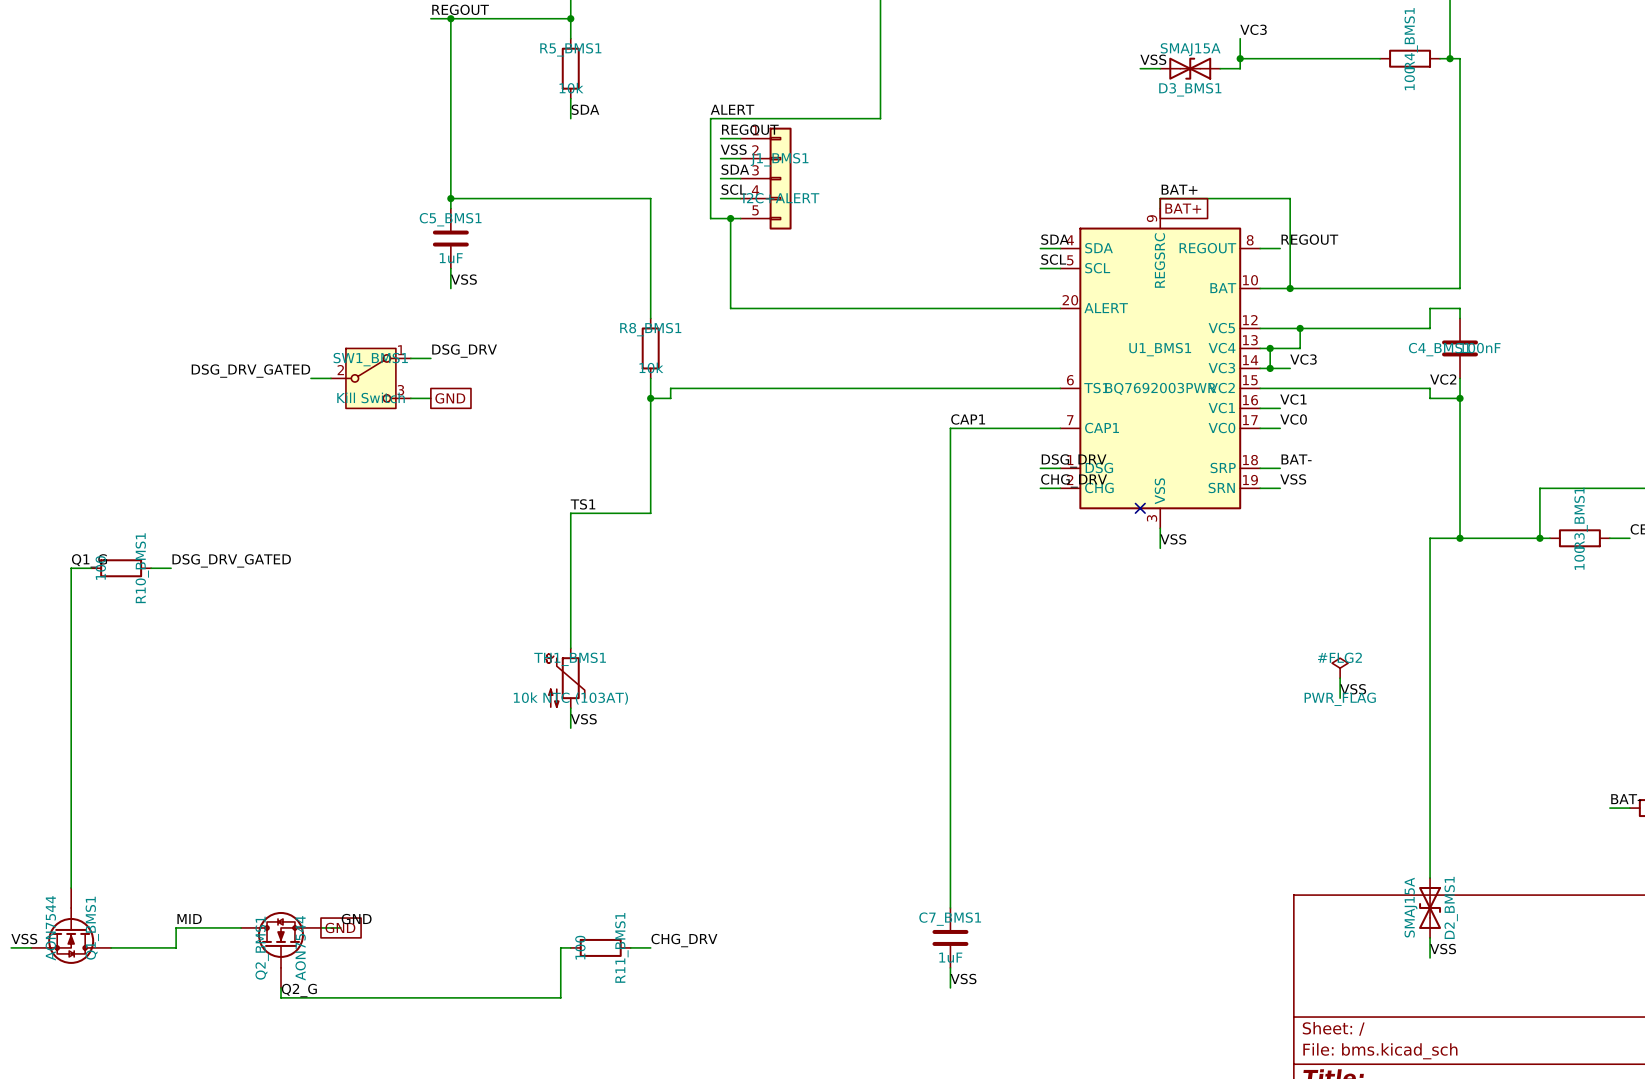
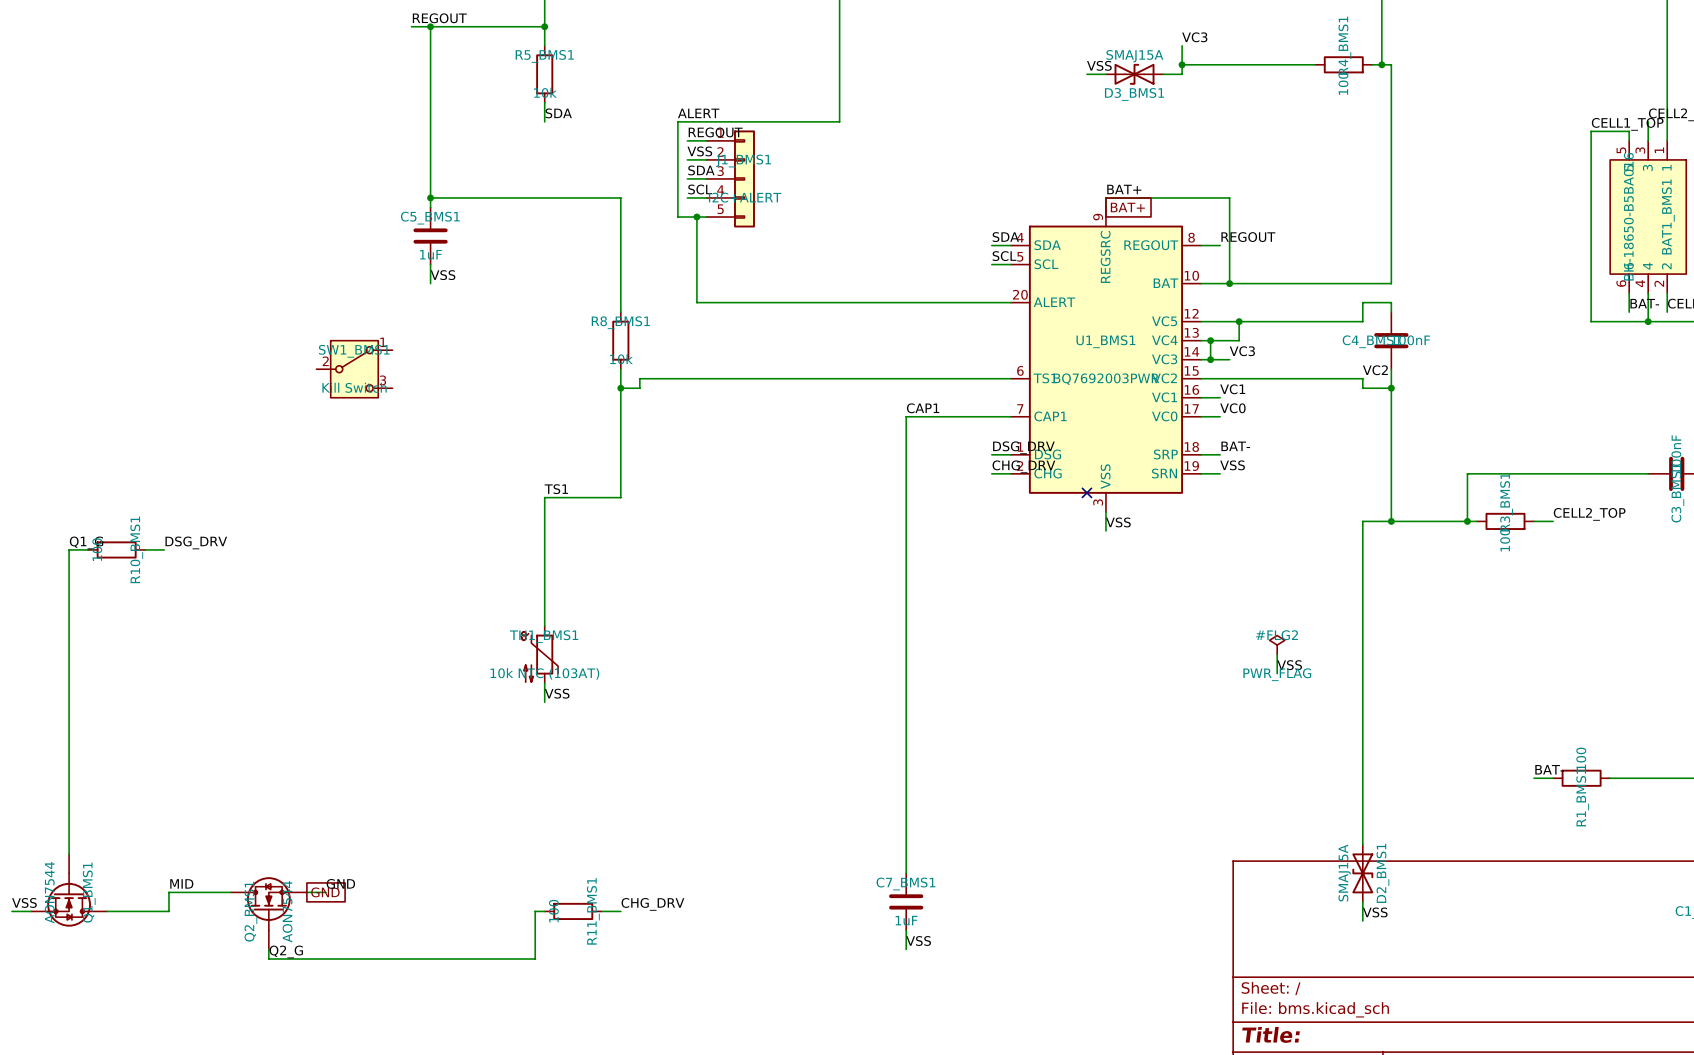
label: DSG_DRV (464, 351) -> none
wire: (410, 358) (430, 358) -> none
label: DSG_DRV_GATED (250, 371) -> none
wire: (310, 378) (330, 378) -> none
wire: (410, 398) (430, 398) -> none
global label: GND (450, 398) -> none
label: DSG_DRV_GATED (231, 560) -> DSG_DRV (196, 542)

